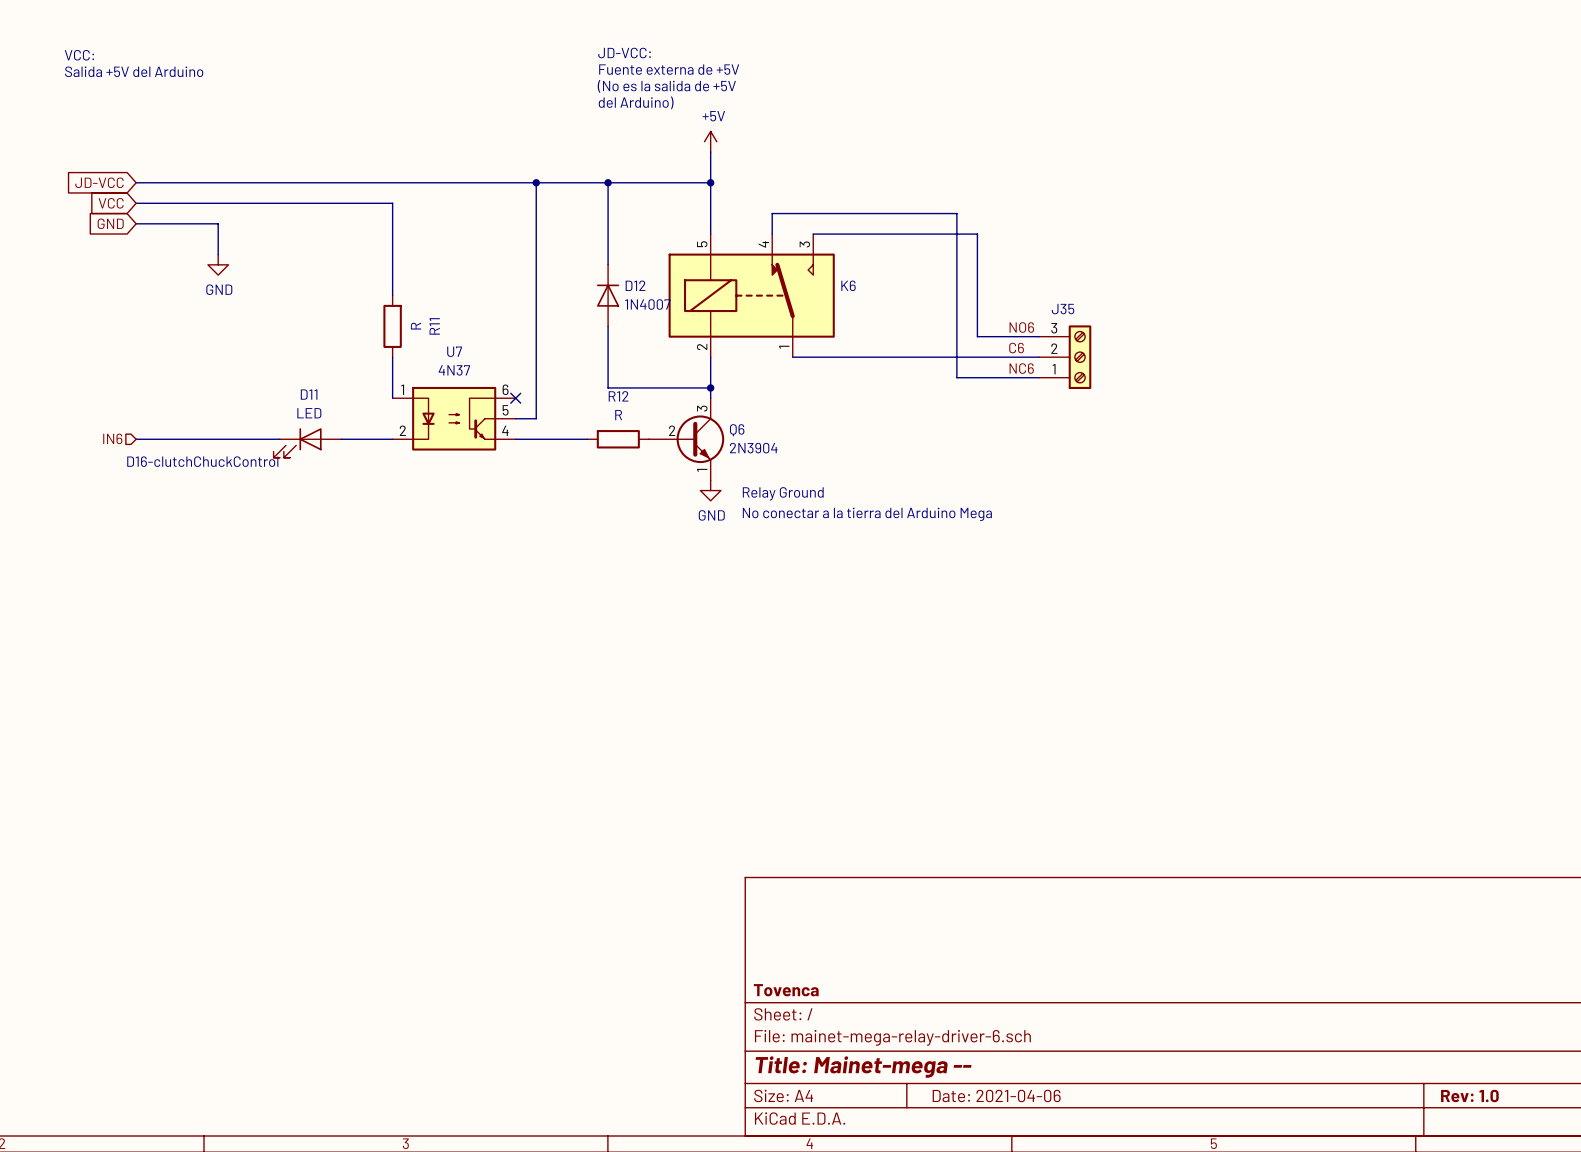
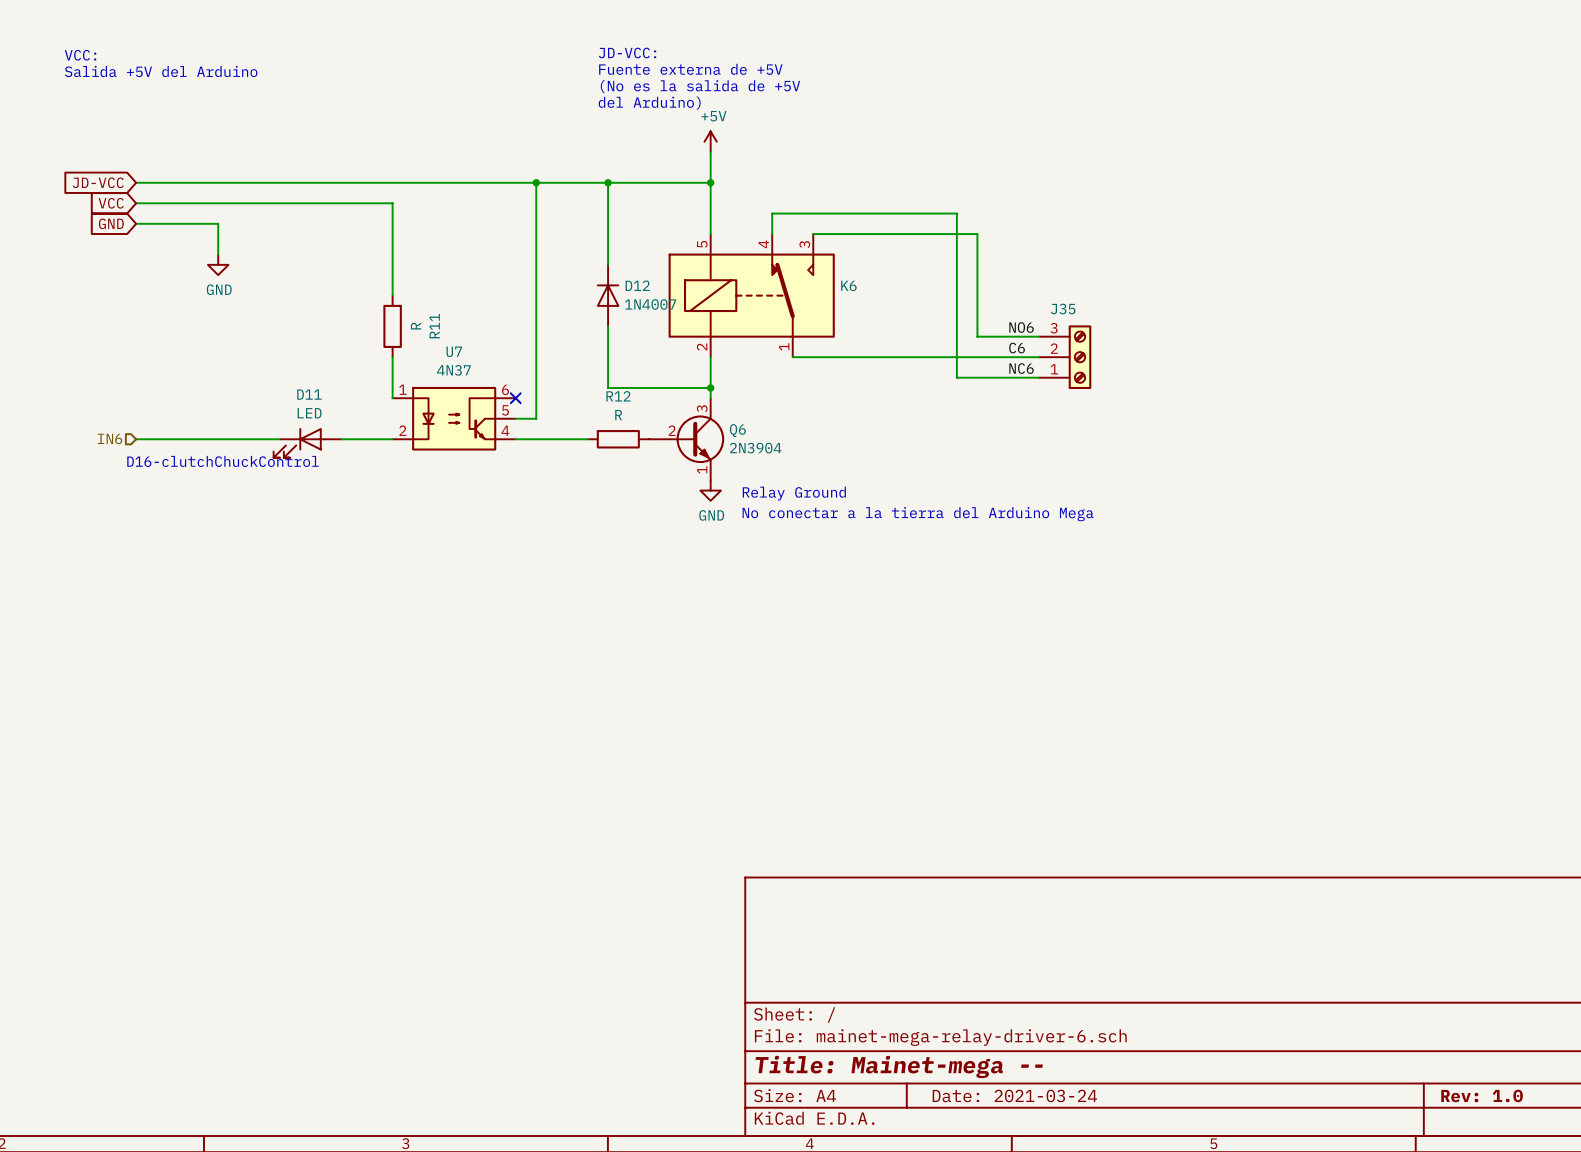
title block: Tovenca (786, 990) -> none
title block: Date: 2021-04-06 (996, 1095) -> Date: 2021-03-24 (1014, 1095)

